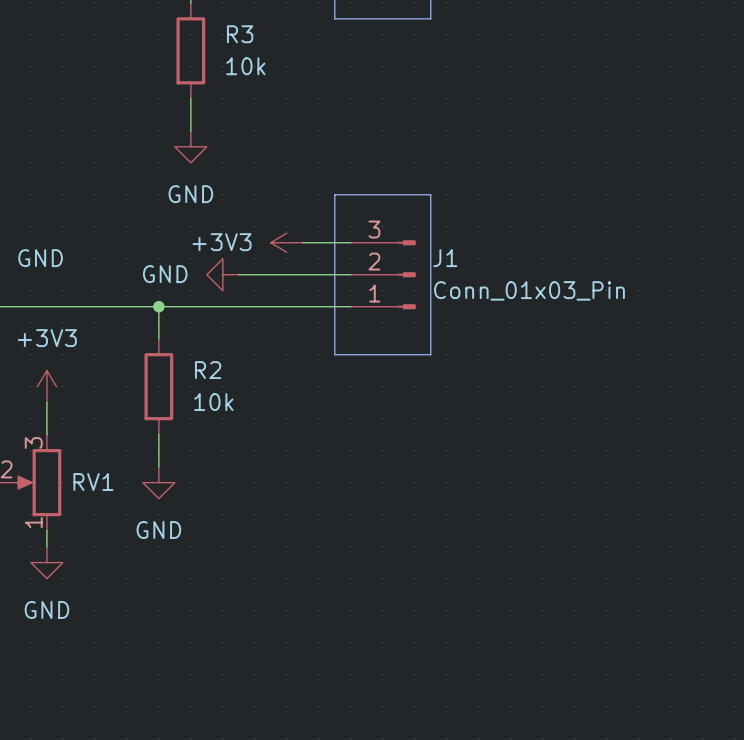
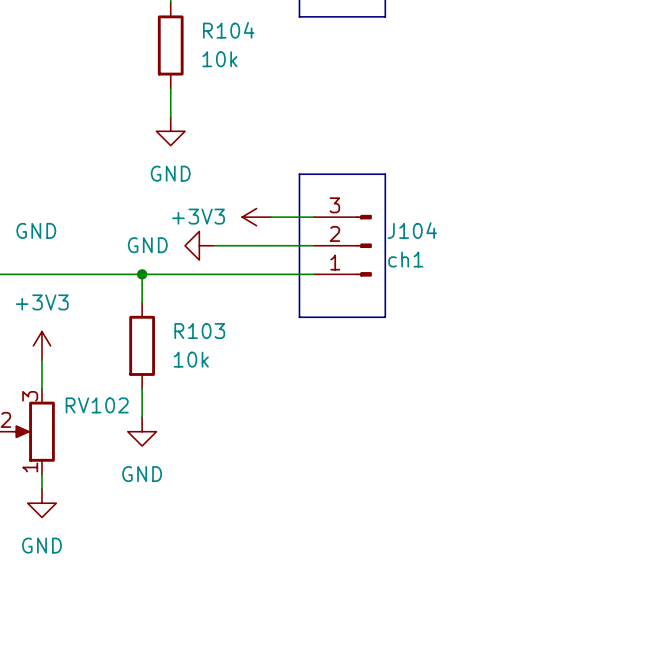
R3 name: R3 (240, 34) -> R104 (228, 30)
J1 name: J1 (445, 258) -> J104 (412, 230)
J1 value: Conn_01x03_Pin (529, 290) -> ch1 (405, 259)
R2 name: R2 (208, 370) -> R103 (199, 331)
RV1 name: RV1 (93, 482) -> RV102 (97, 405)

